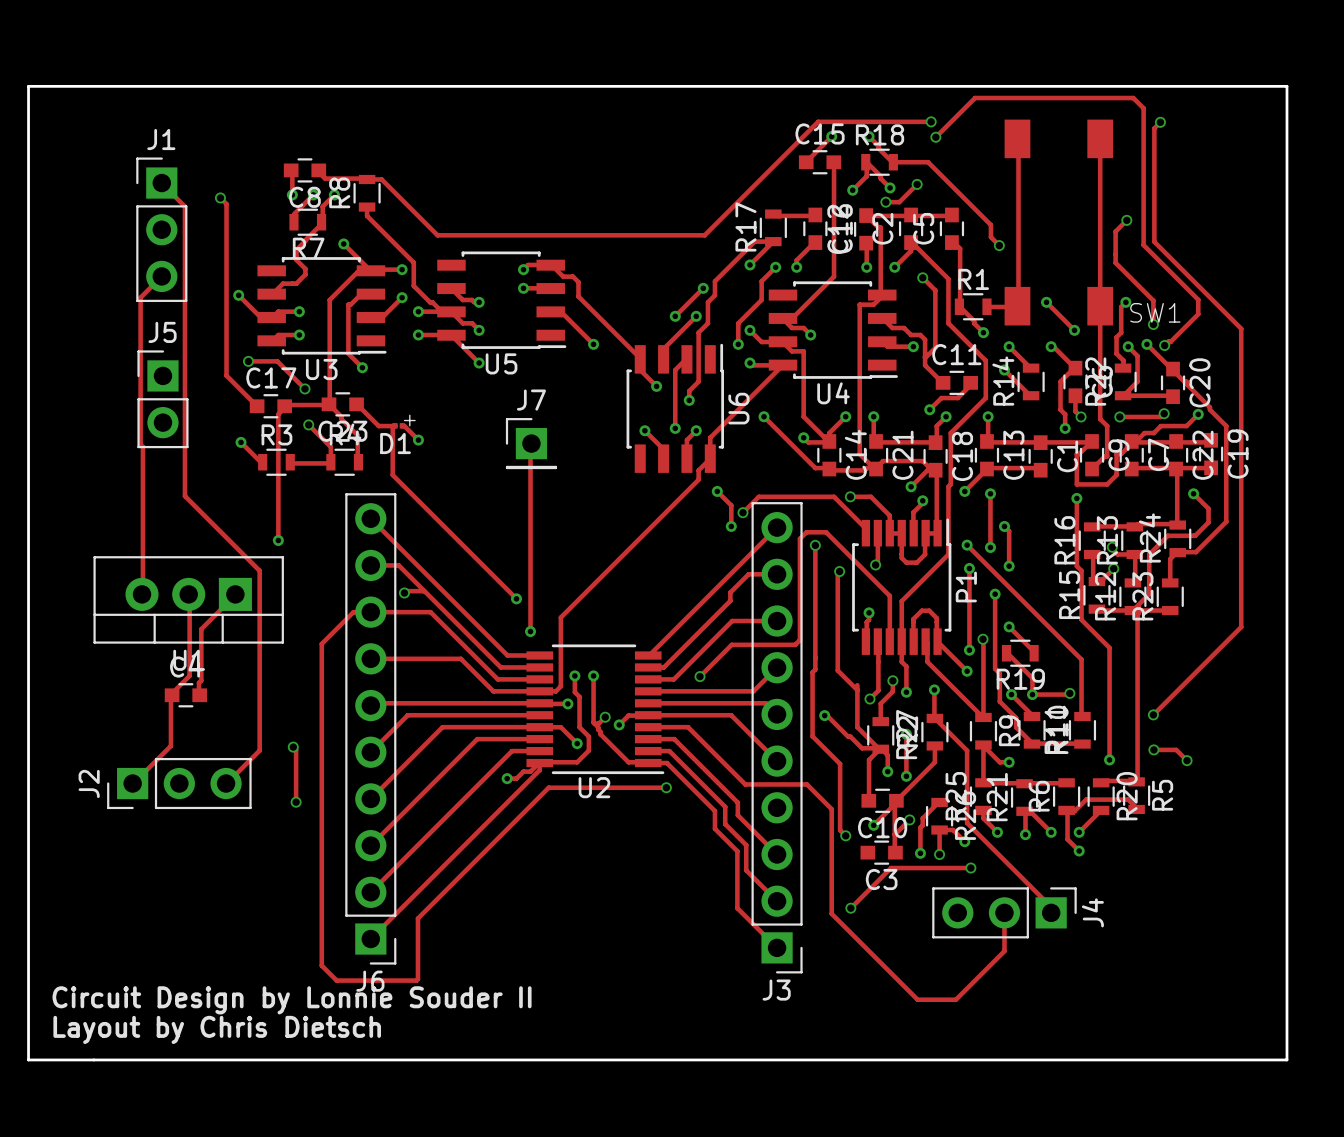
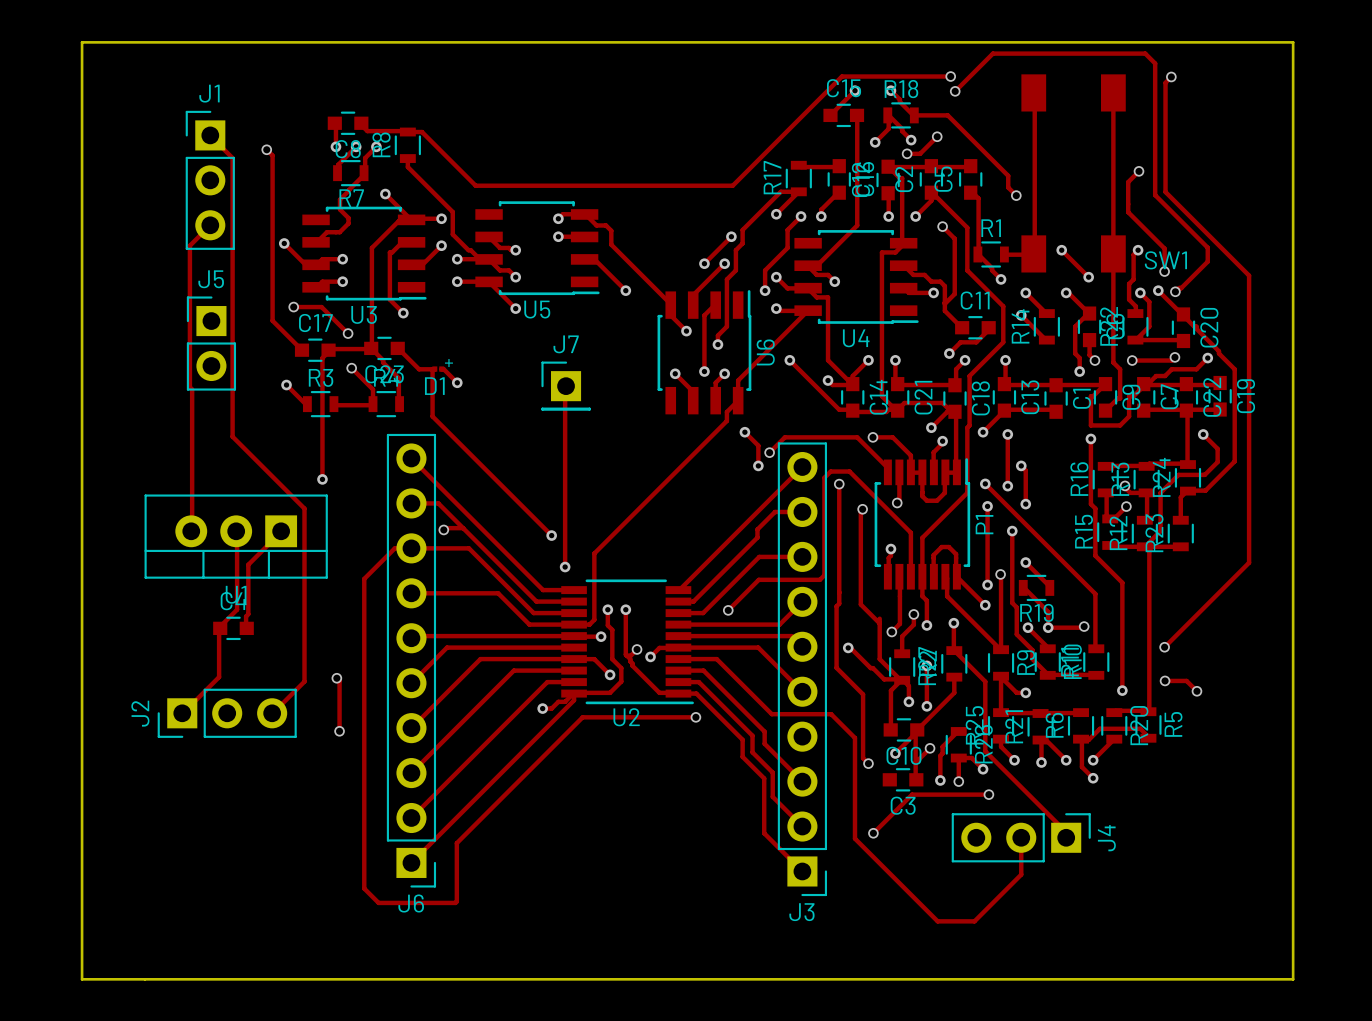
text: Circuit Design by Lonnie Souder II (292, 1000) -> none
text: Layout by Chris Dietsch (217, 1029) -> none

